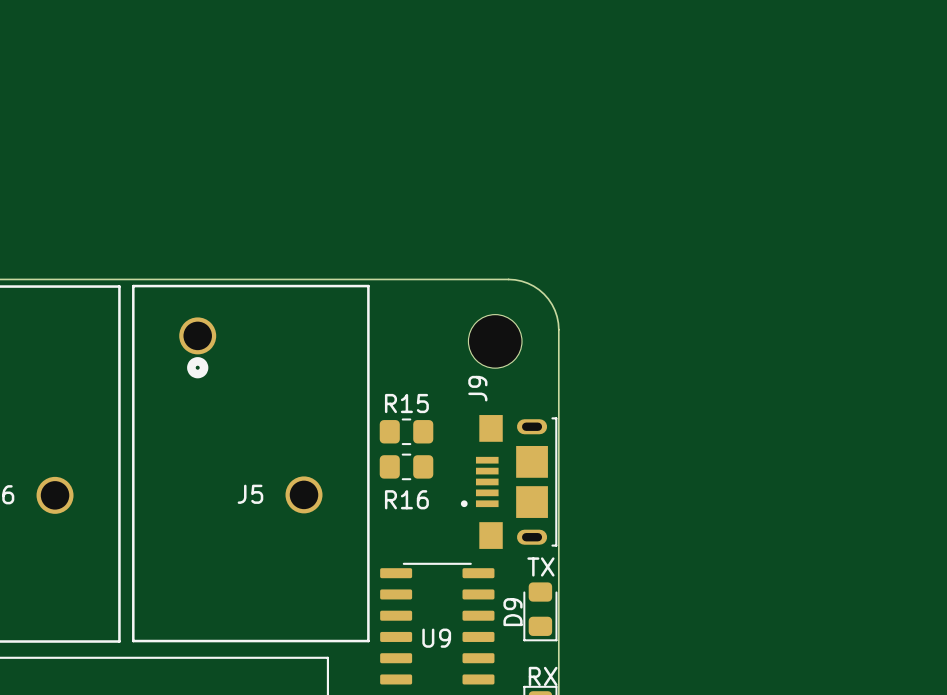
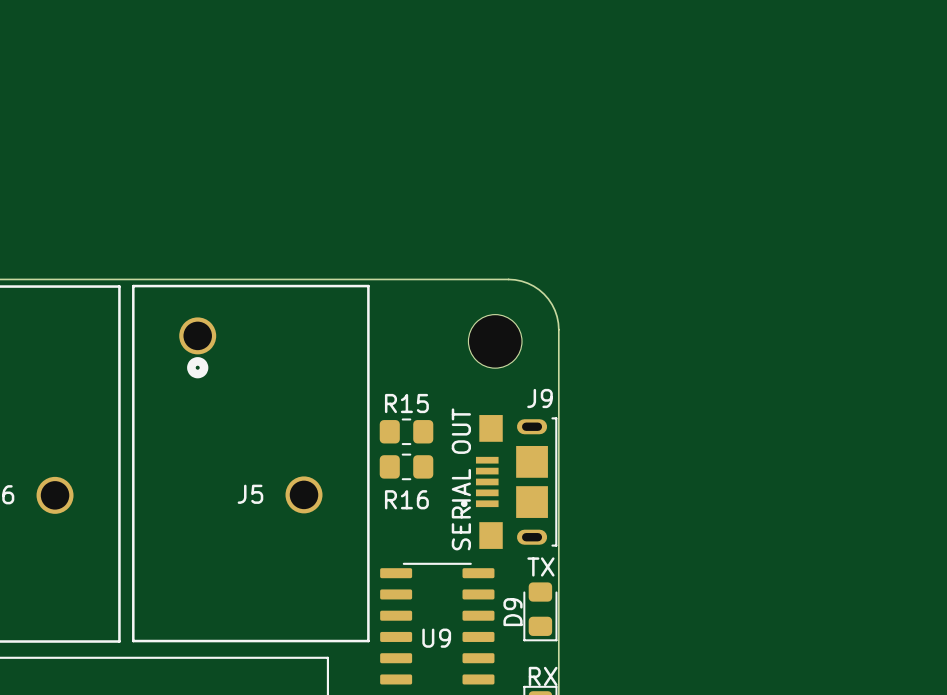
J9 name rotation: 0° (477, 388) -> 90° clockwise (540, 398)
J9 name position: J9 (477, 388) -> J9 (540, 398)
text: none -> SERIAL OUT (461, 479)

